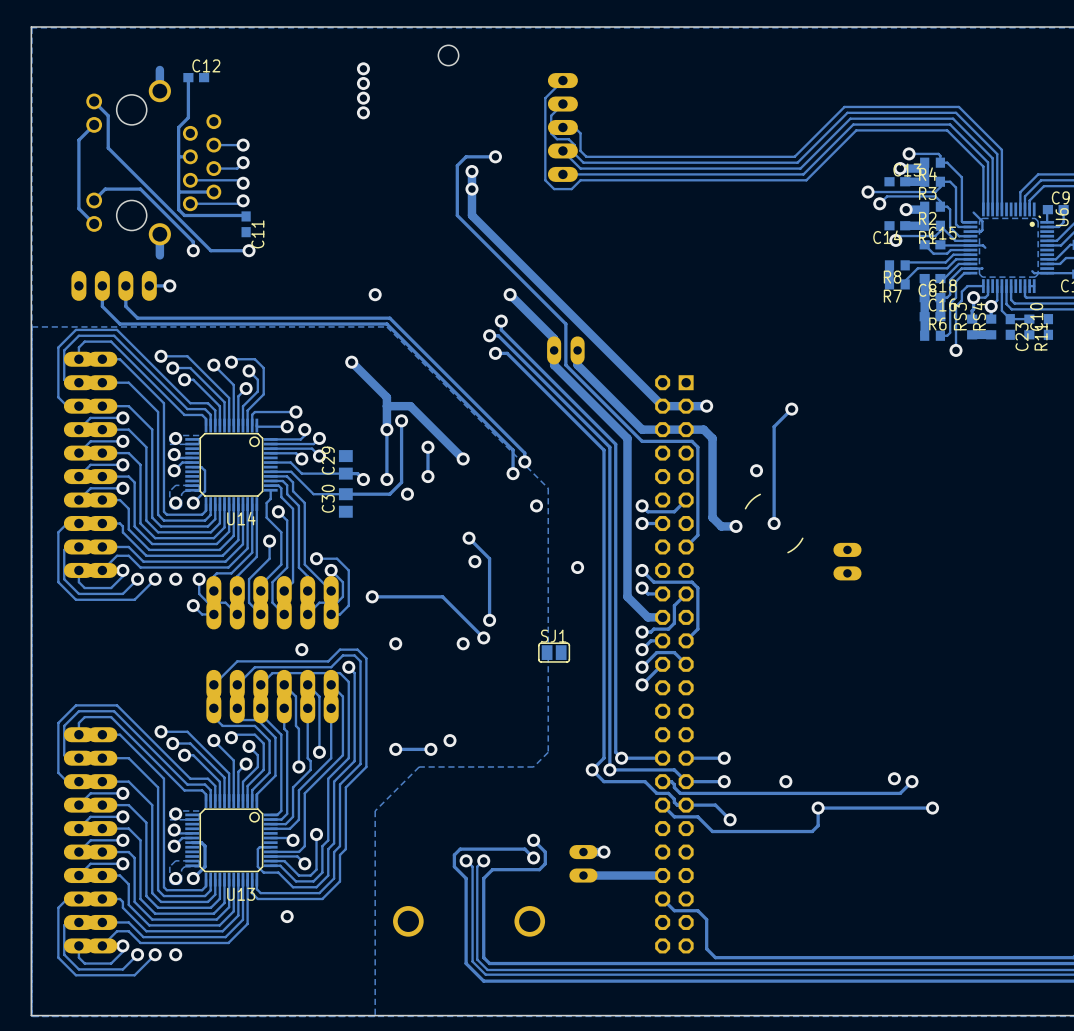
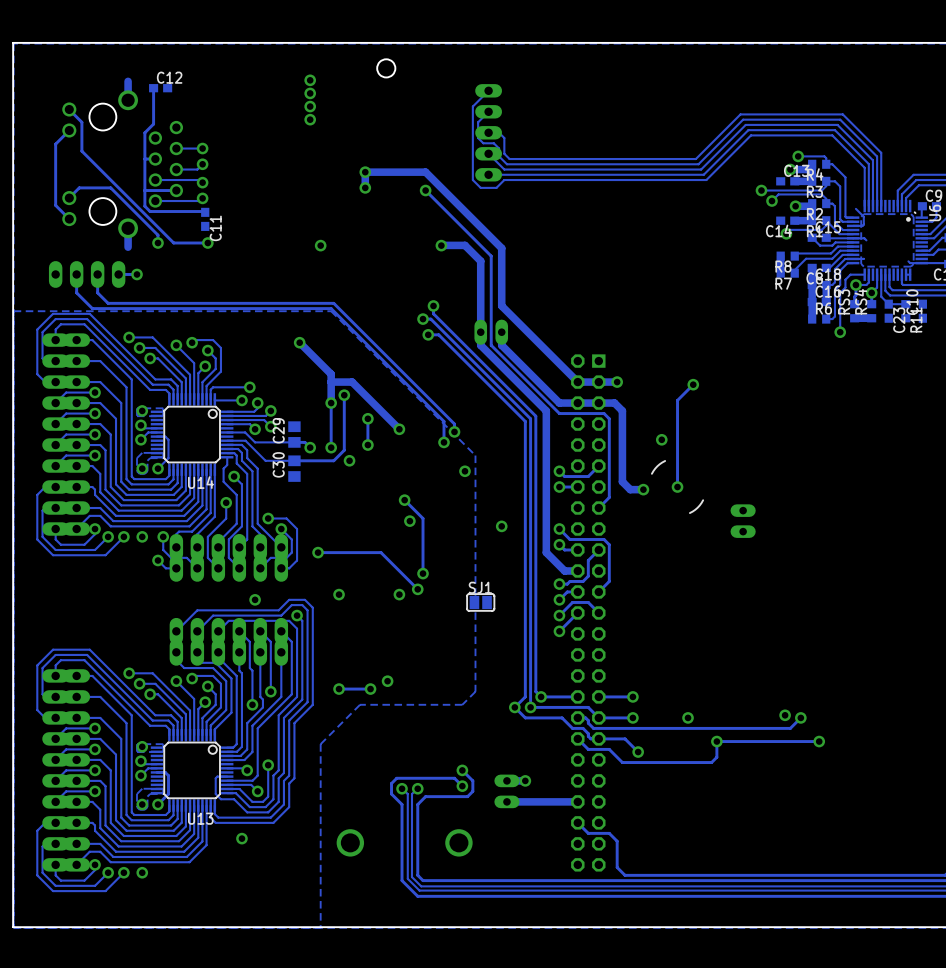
track: (495, 156) (466, 156) (457, 165) (457, 215) (565, 324) -> (425, 190) (491, 256) (491, 308)
via: (495, 156) -> none
via: none -> (365, 172)
track: (471, 171) (471, 215) (577, 321) -> (365, 187) (365, 172) (425, 172) (501, 248) (501, 305)
via: (471, 171) -> none
via: none -> (365, 187)
via: (471, 189) -> none
via: none -> (425, 190)
via: none -> (441, 245)
via position: (375, 294) -> (320, 245)
track: (509, 294) (554, 338) -> (441, 245) (464, 245) (480, 261) (480, 321)
via: (510, 294) -> none

